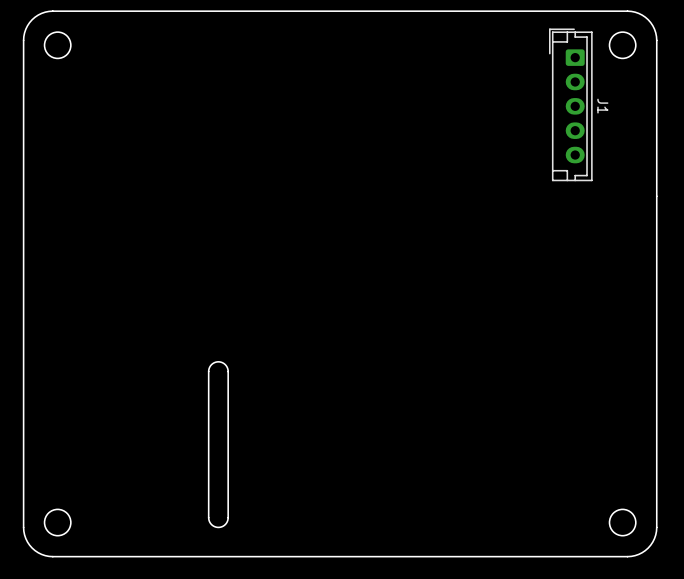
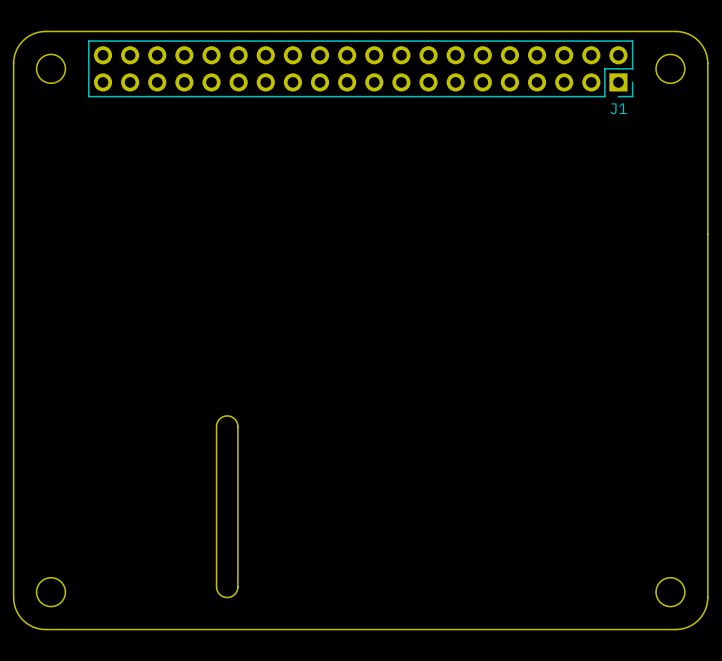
J1 footprint: [549, 28, 593, 182] -> [88, 40, 634, 98]
J1 name position: J1 (602, 106) -> J1 (618, 108)

